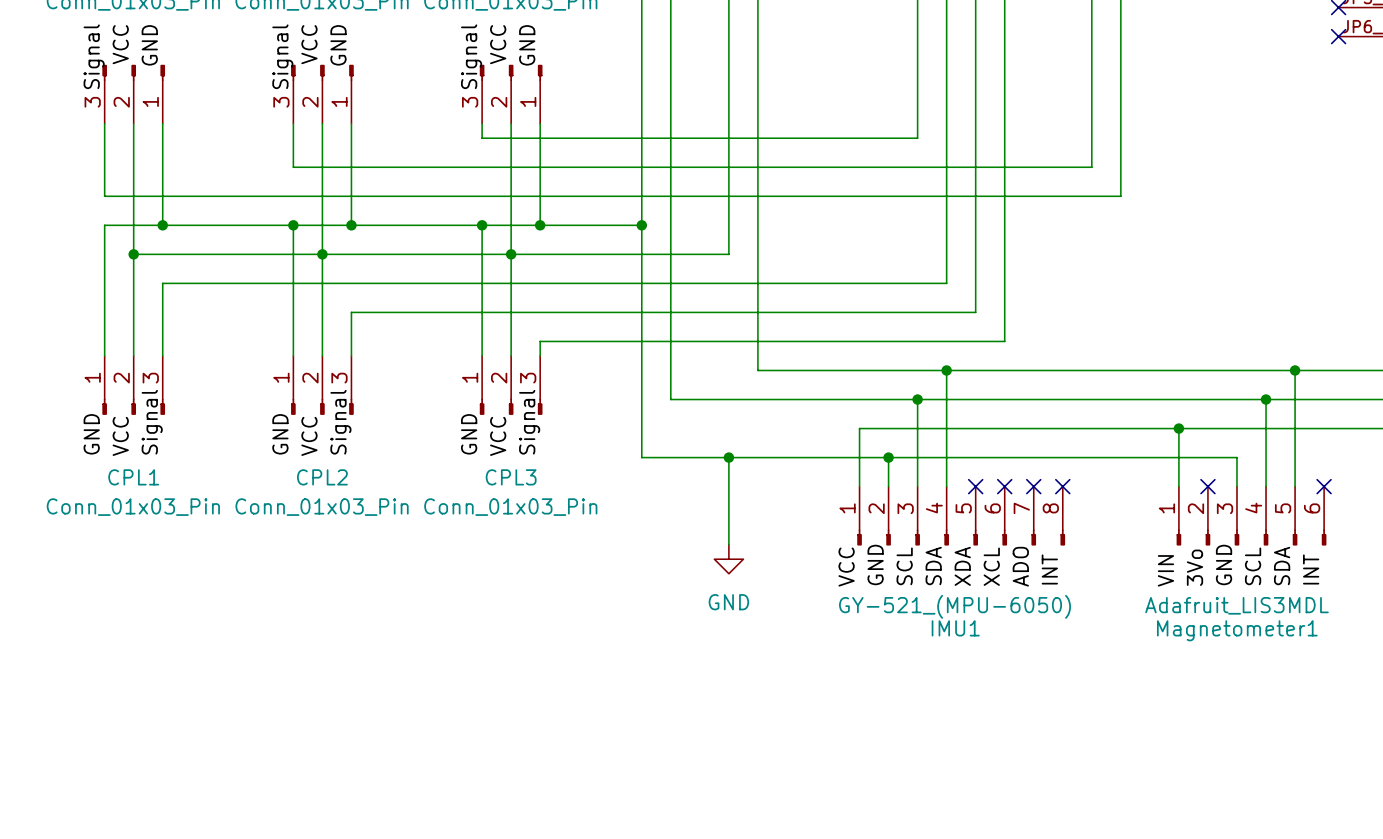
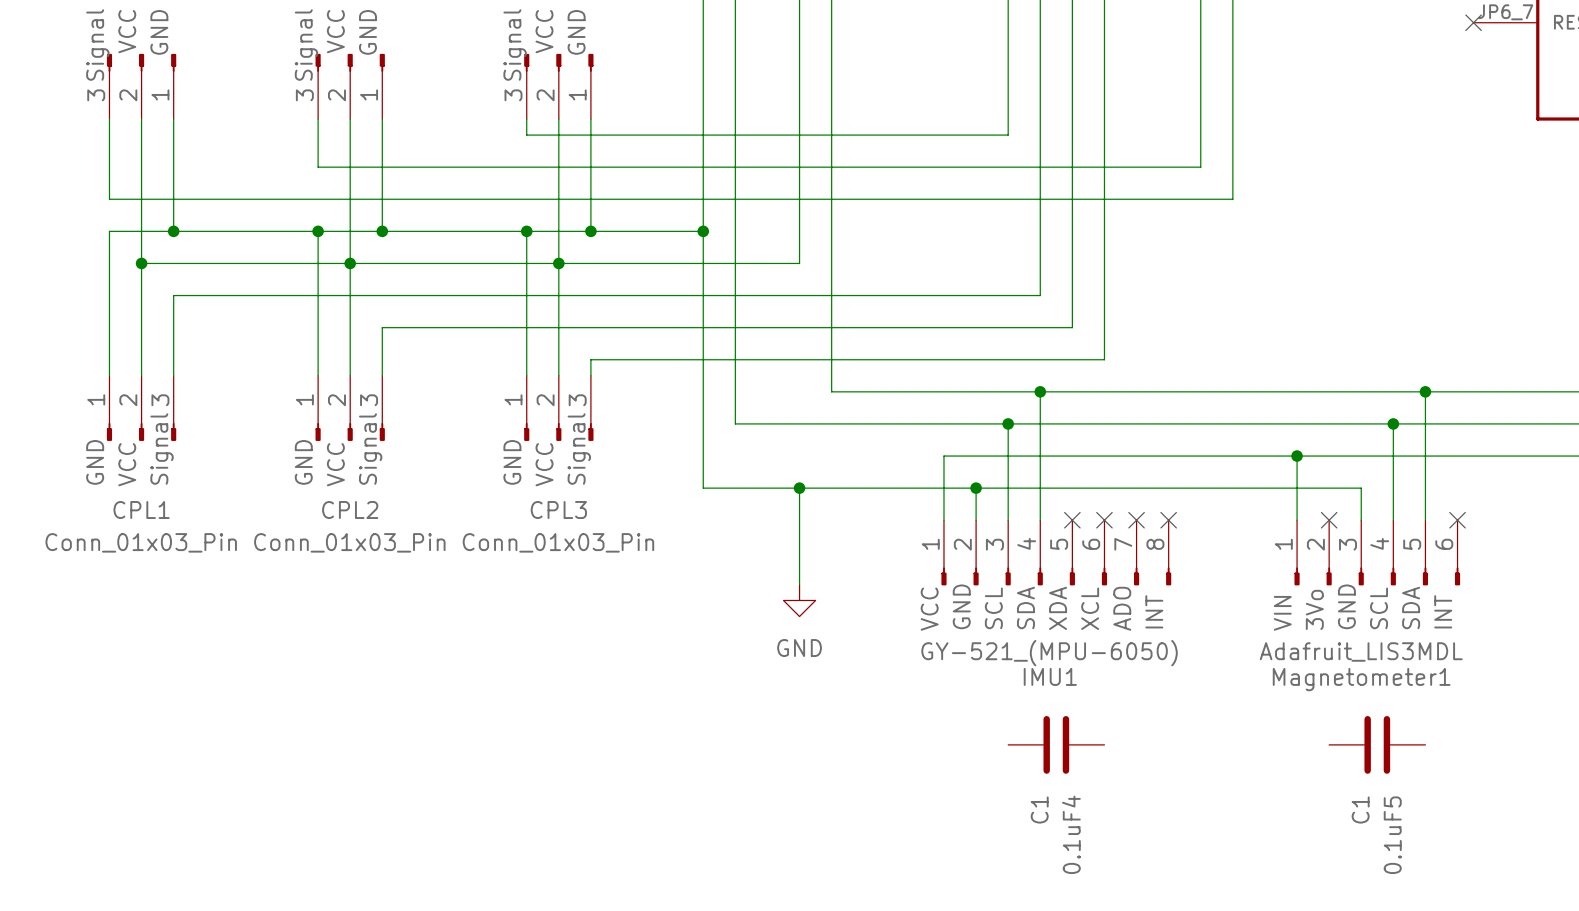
0.1uF4: none -> C1 (1056, 744)
0.1uF5: none -> C1 (1377, 744)

